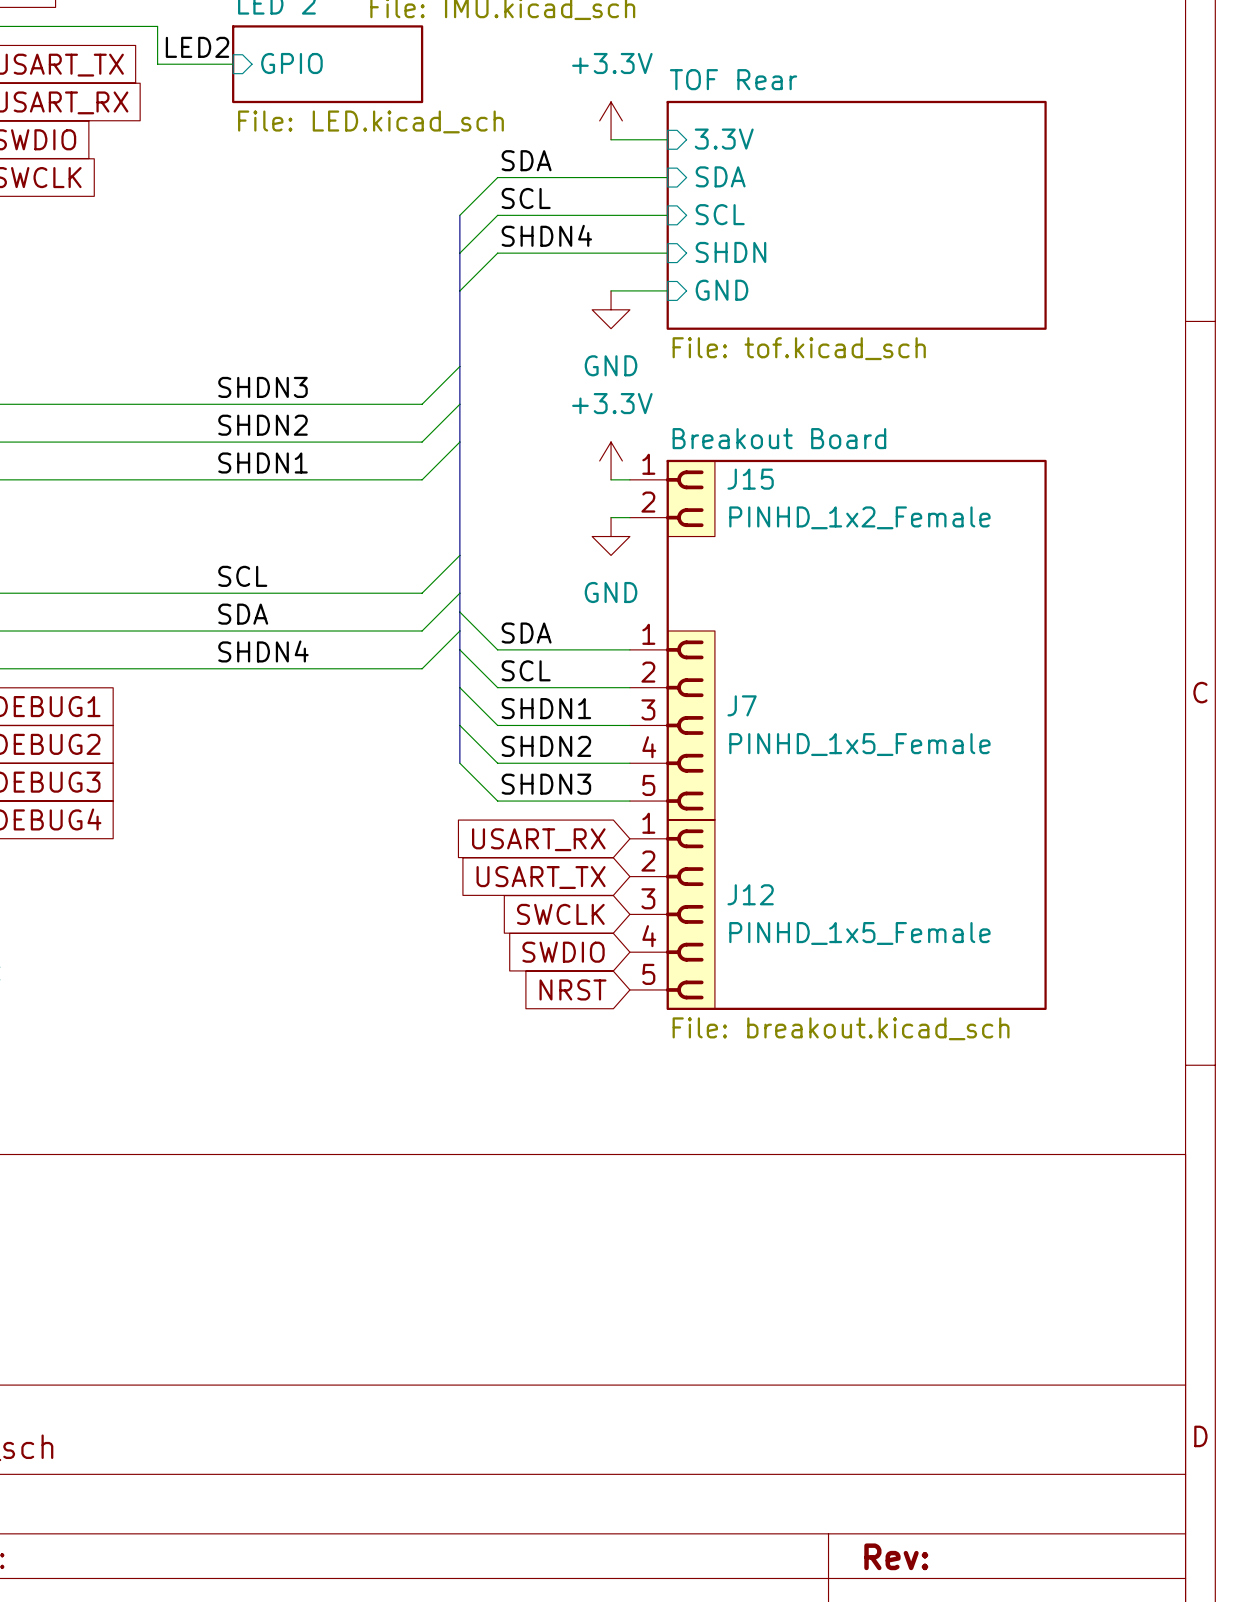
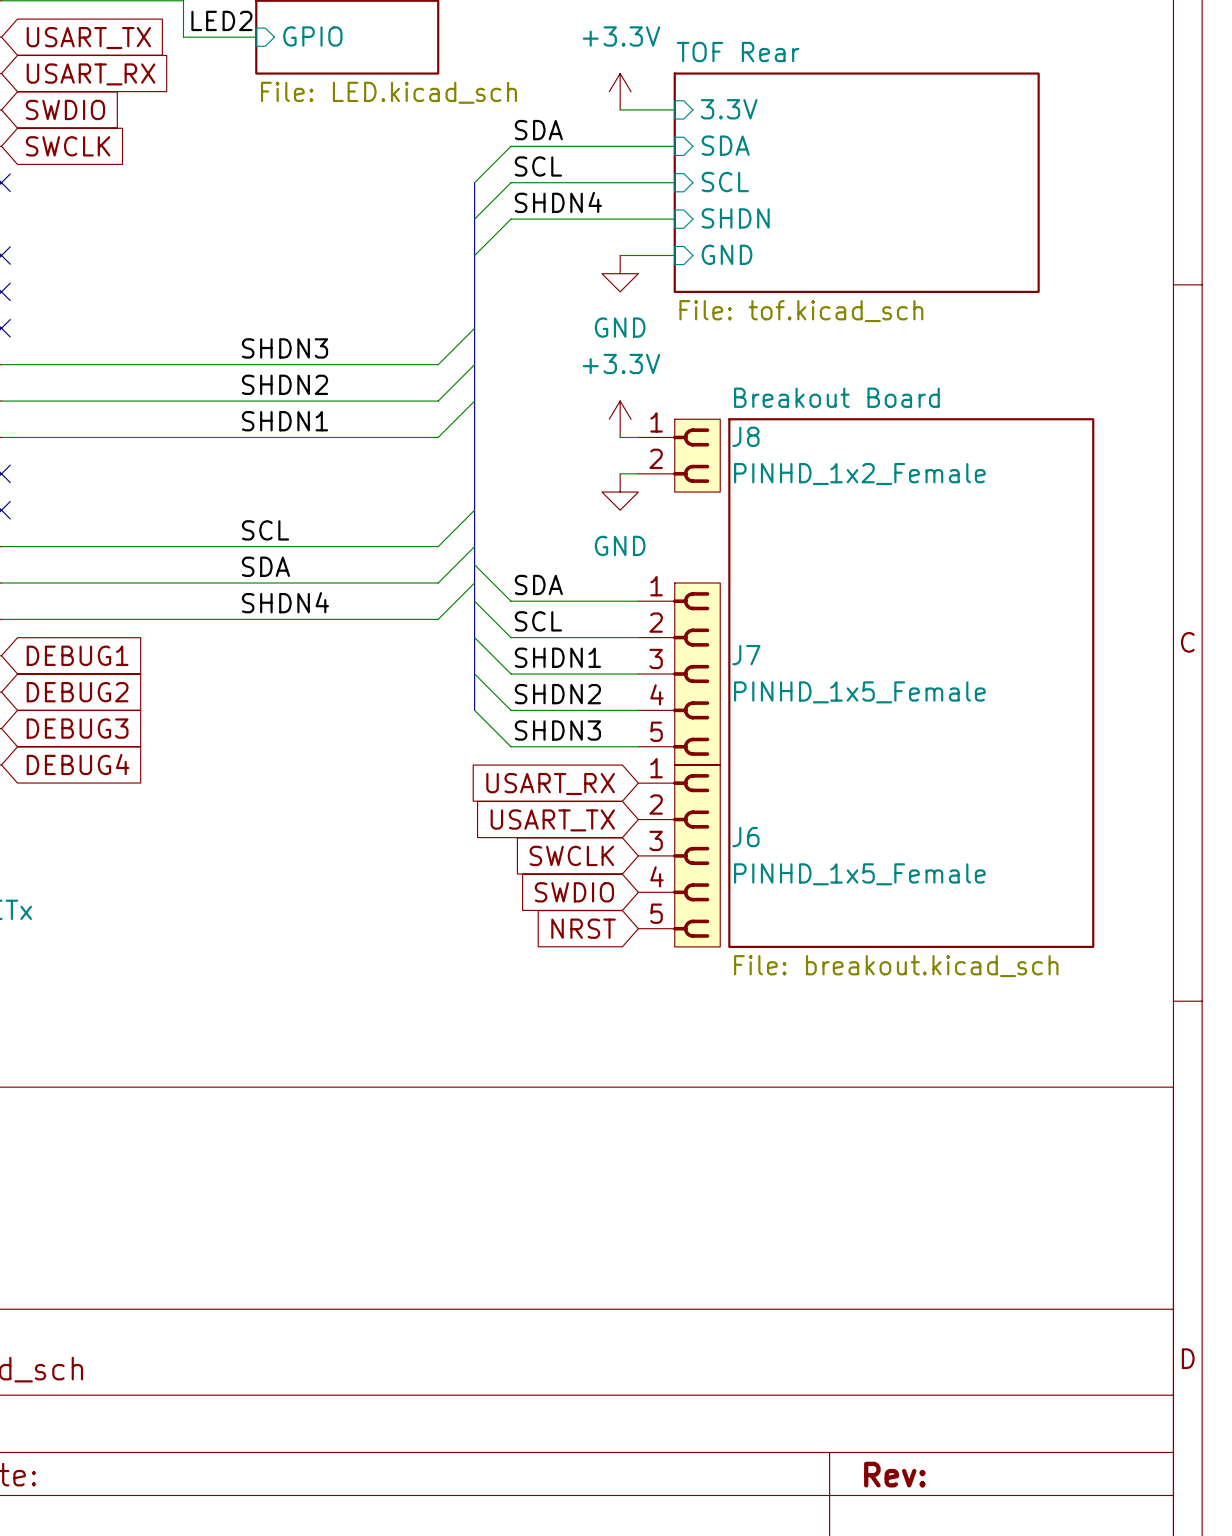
J15 name: J15 (750, 479) -> J8 (745, 436)
sheet Breakout Board position: (856, 734) -> (911, 683)
J12 name: J12 (750, 894) -> J6 (745, 837)

